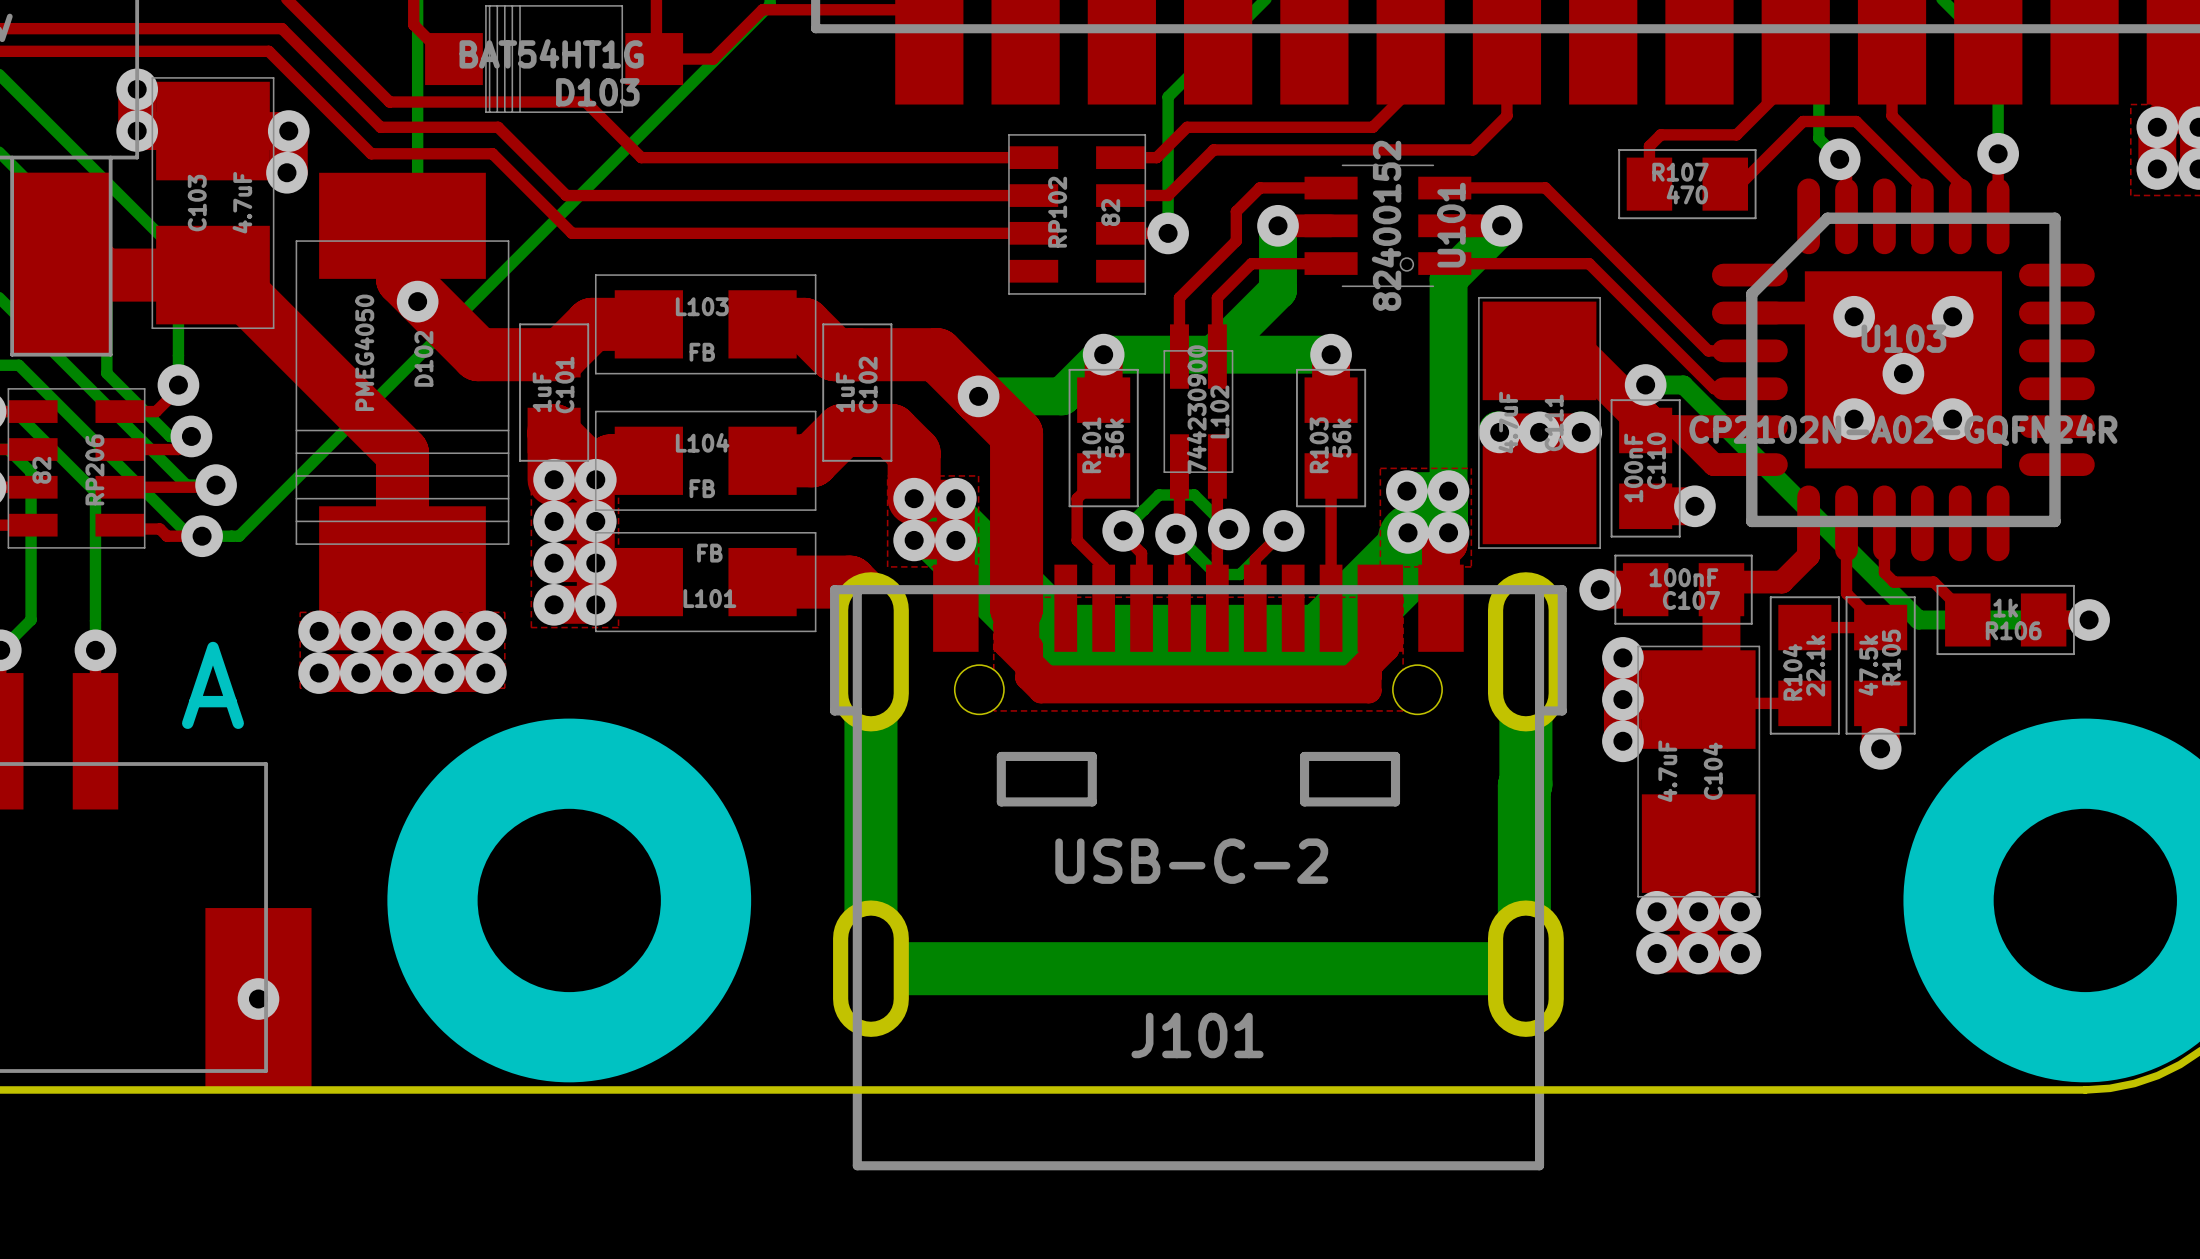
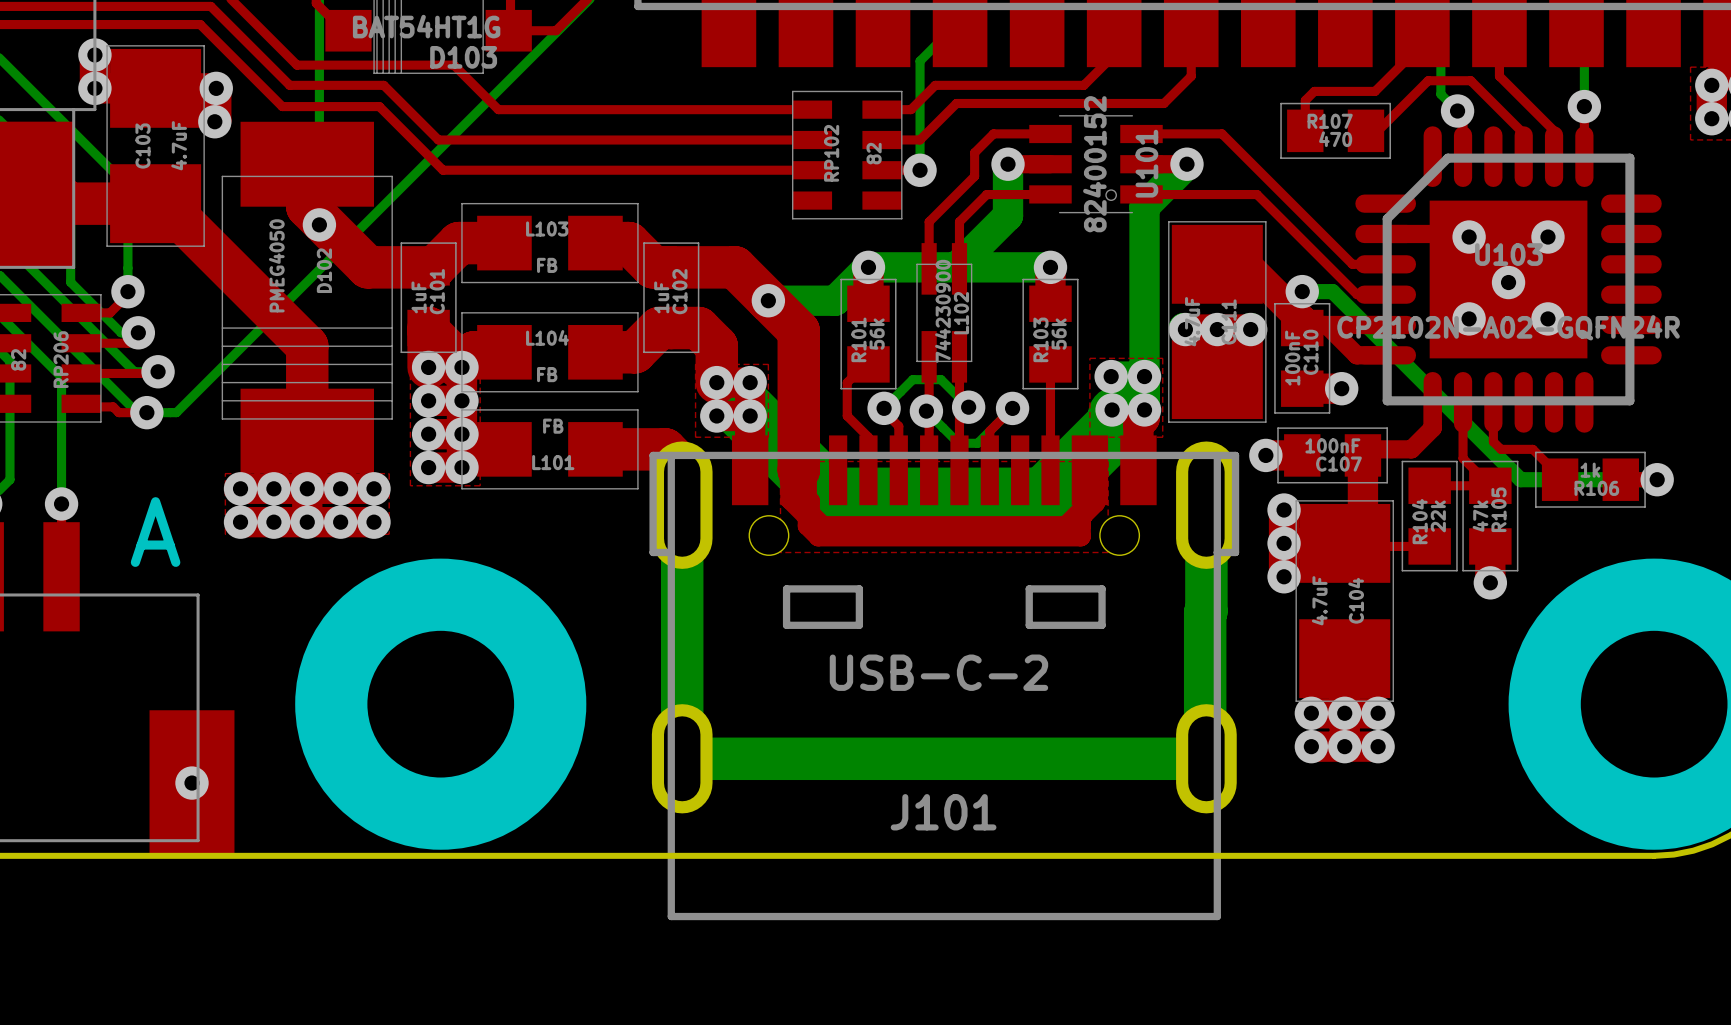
R104 value: 22.1k (1815, 665) -> 22k (1438, 516)
R105 value: 47.5k (1868, 665) -> 47k (1480, 516)

